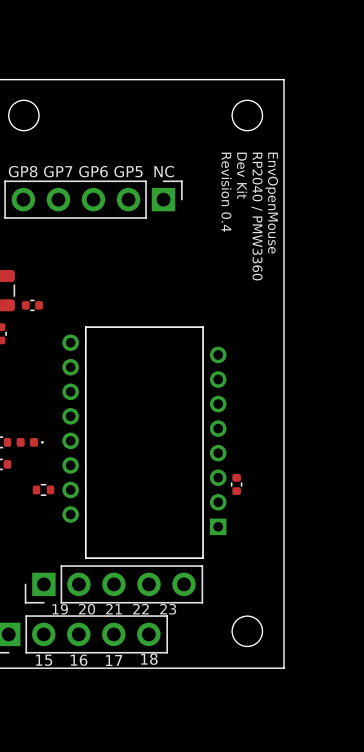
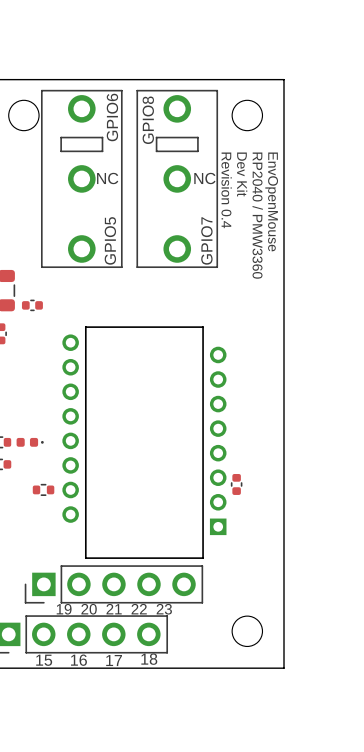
text: none -> GPIO6 (112, 117)
text: none -> GPIO8 (148, 120)
text: GP8 (23, 171) -> none
text: GP7 (58, 171) -> none
text: GP6 (93, 171) -> none
text: GP5 (128, 171) -> none
text: NC (164, 171) -> none
part: none -> (81, 178)
text: none -> NC (107, 178)
part: none -> (177, 178)
text: none -> NC (204, 178)
part: (93, 199) -> none
text: none -> GPIO5 (110, 240)
text: none -> GPIO7 (206, 240)

